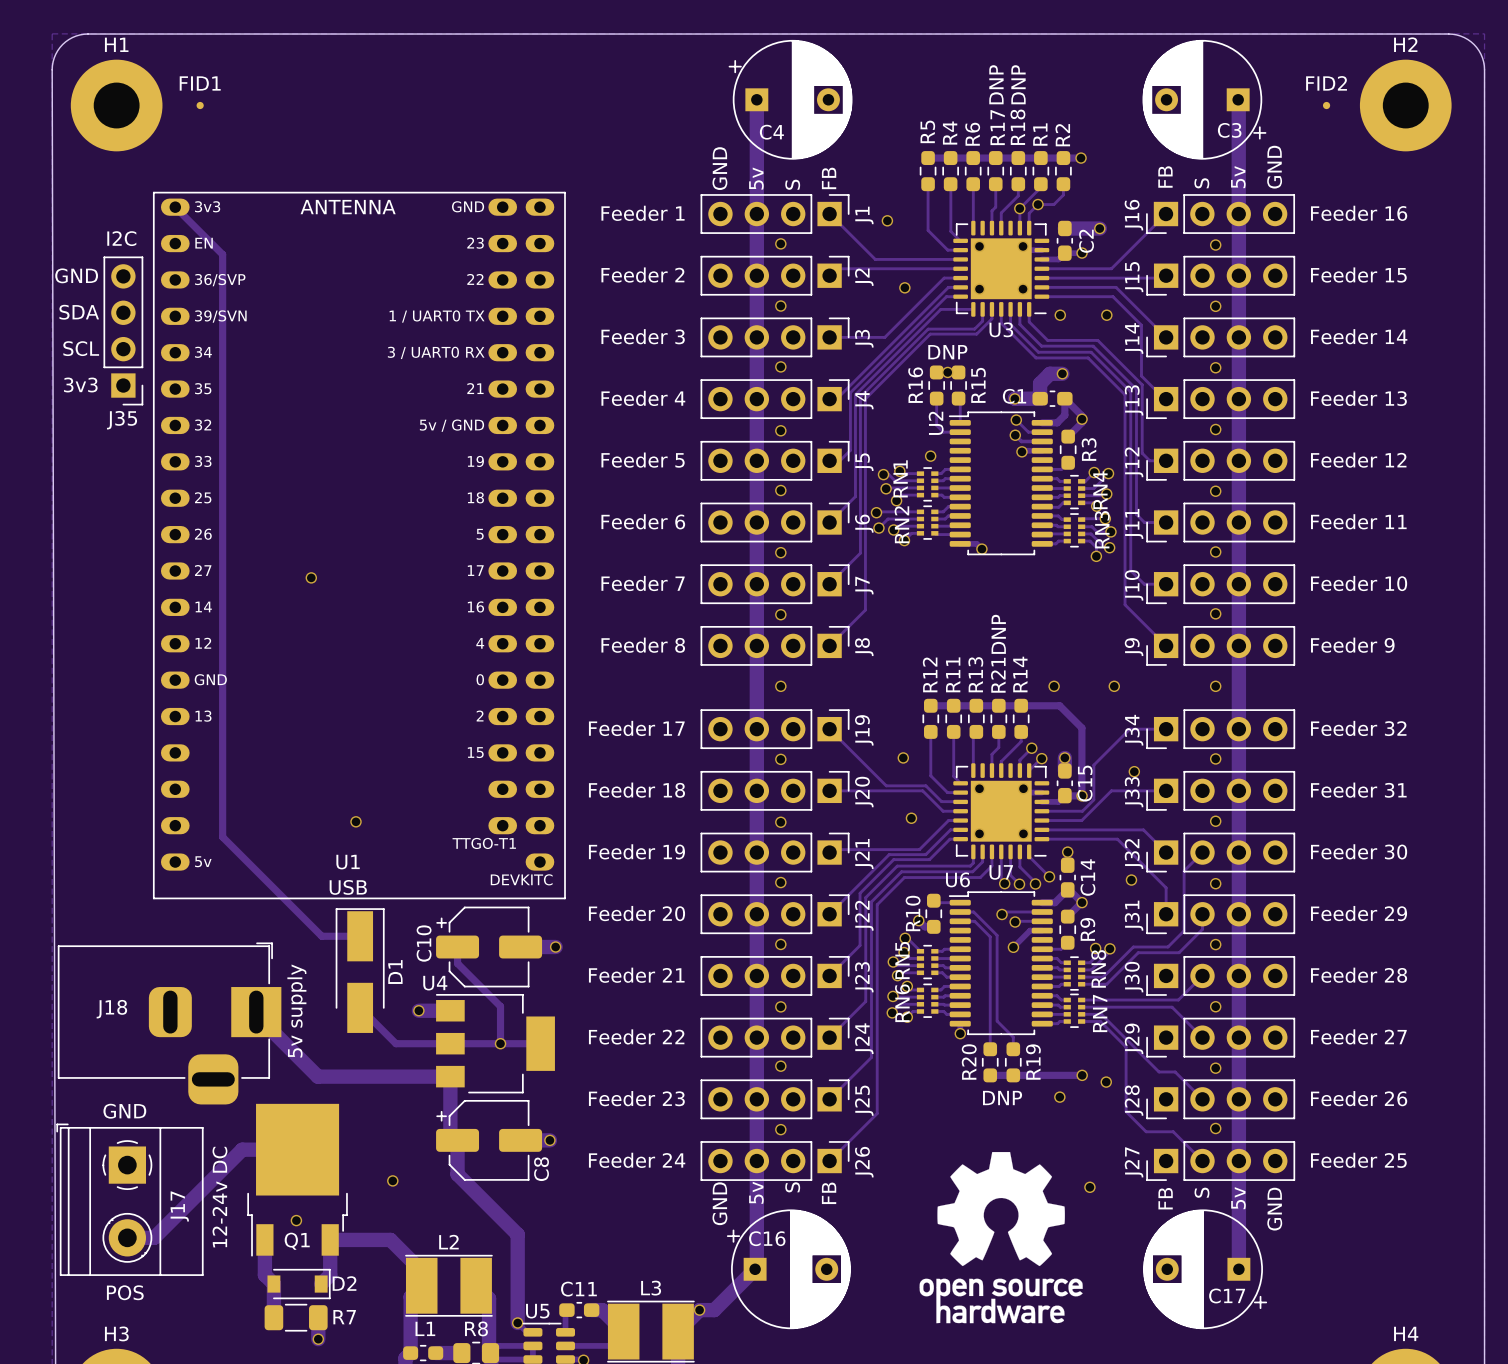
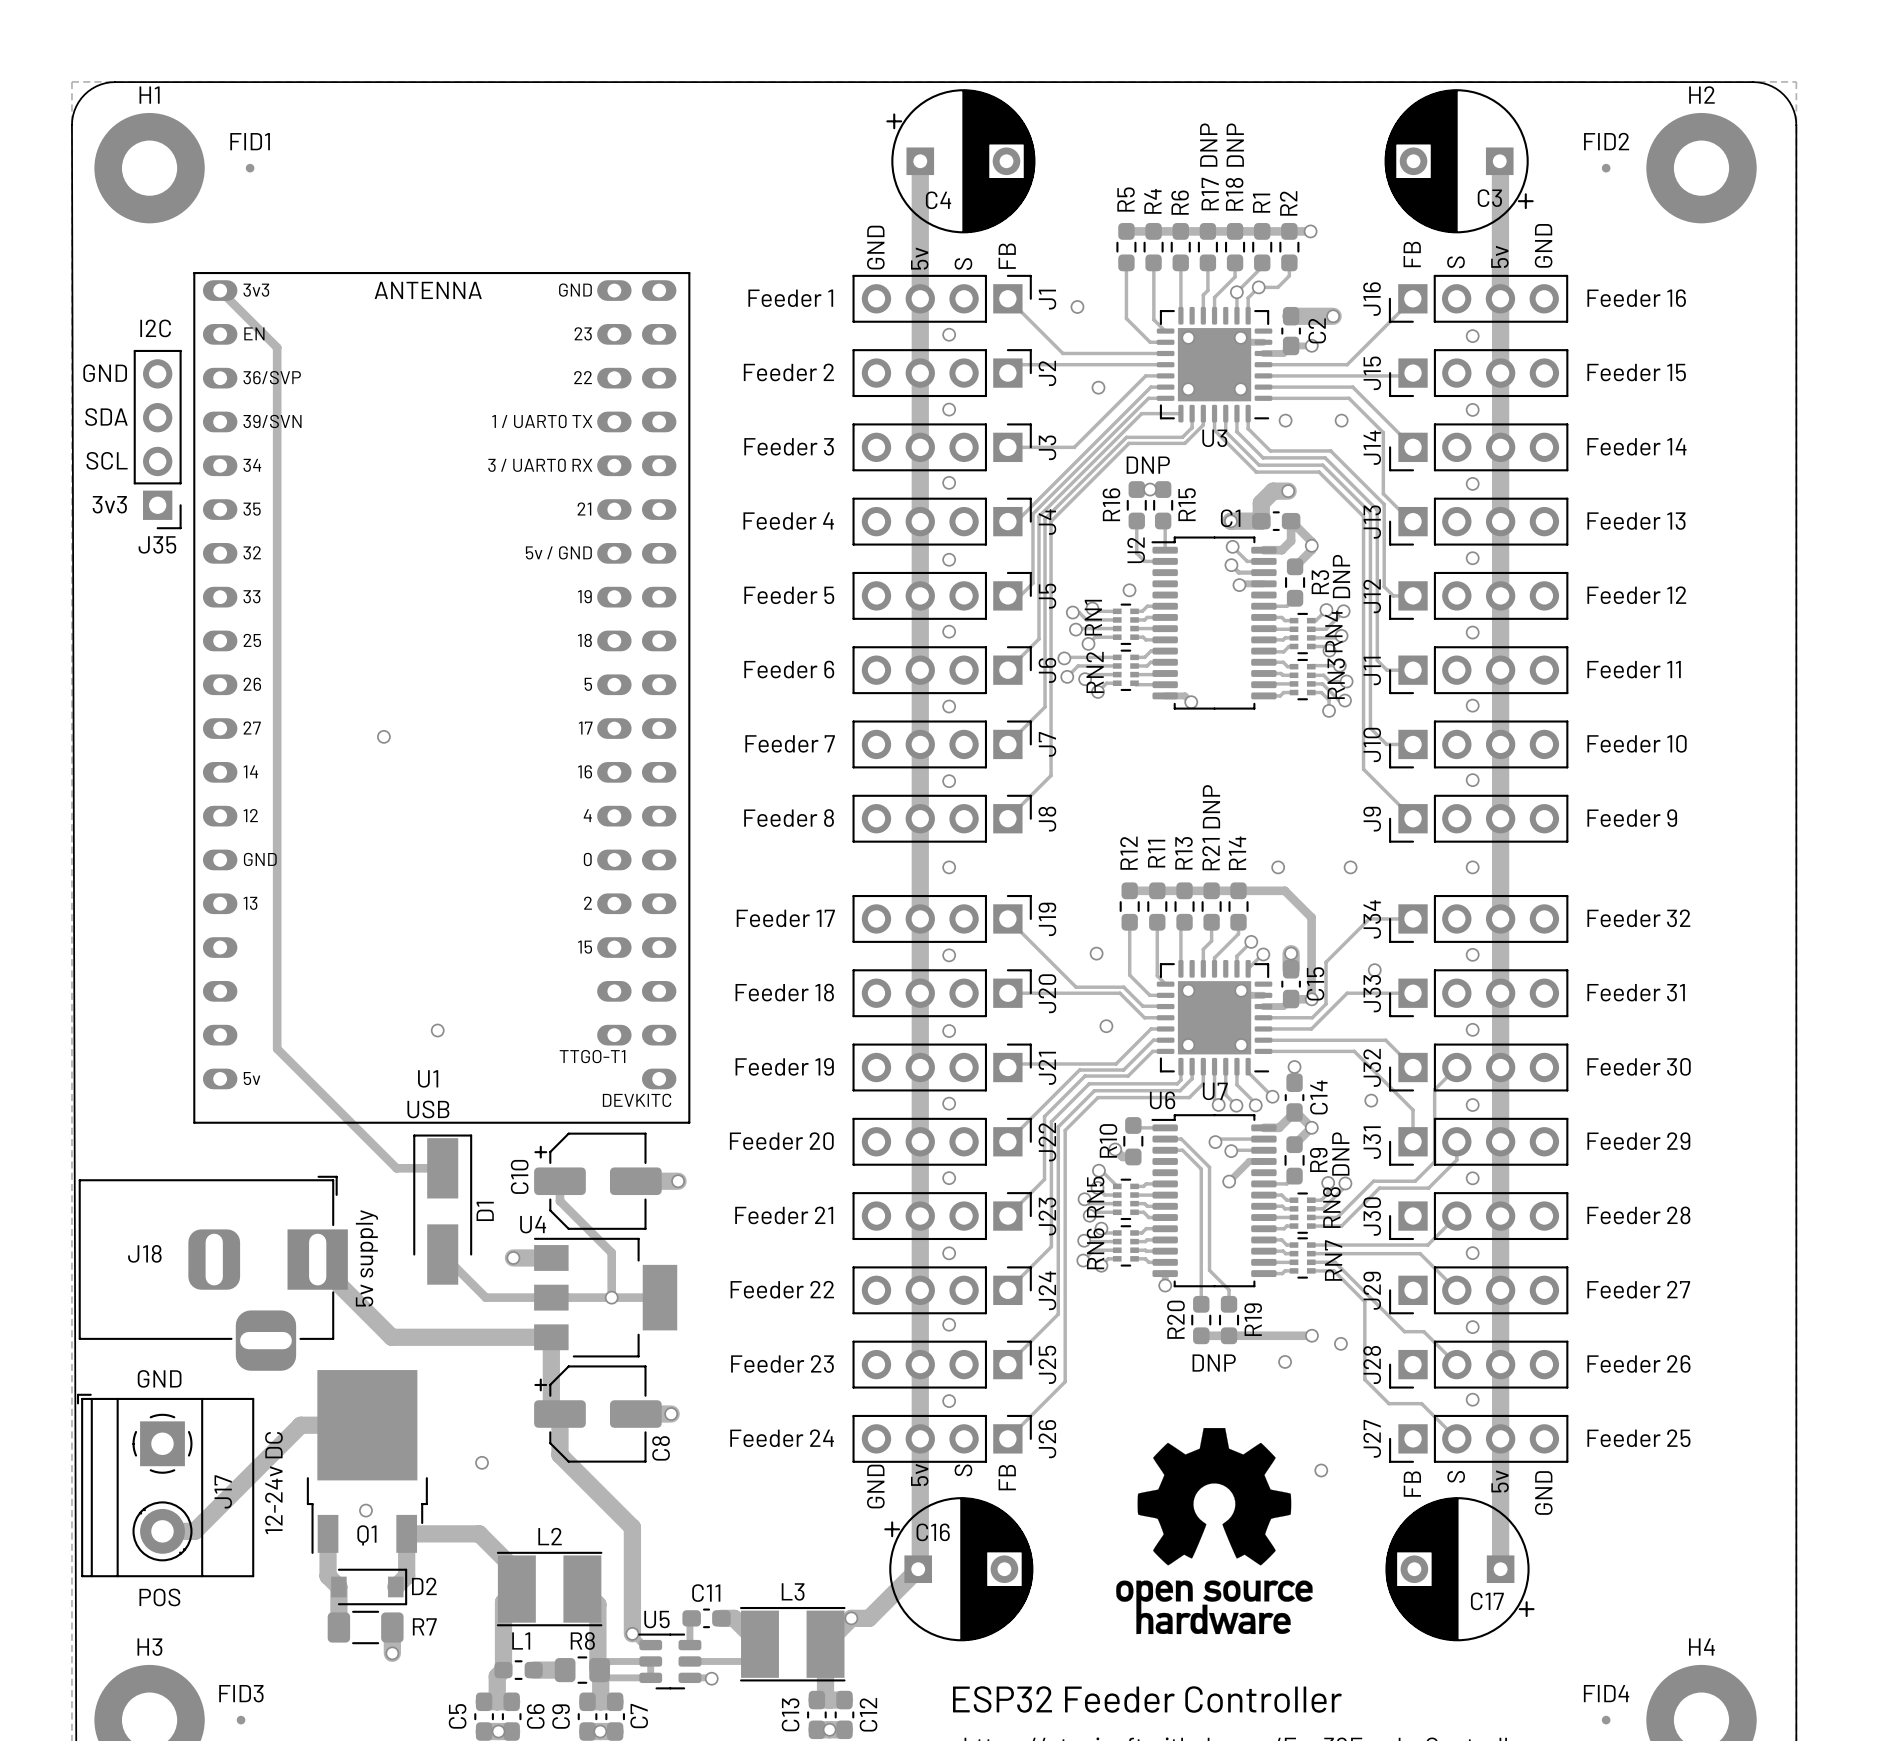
text: none -> DNP (1341, 576)
text: none -> DNP (1340, 1154)

